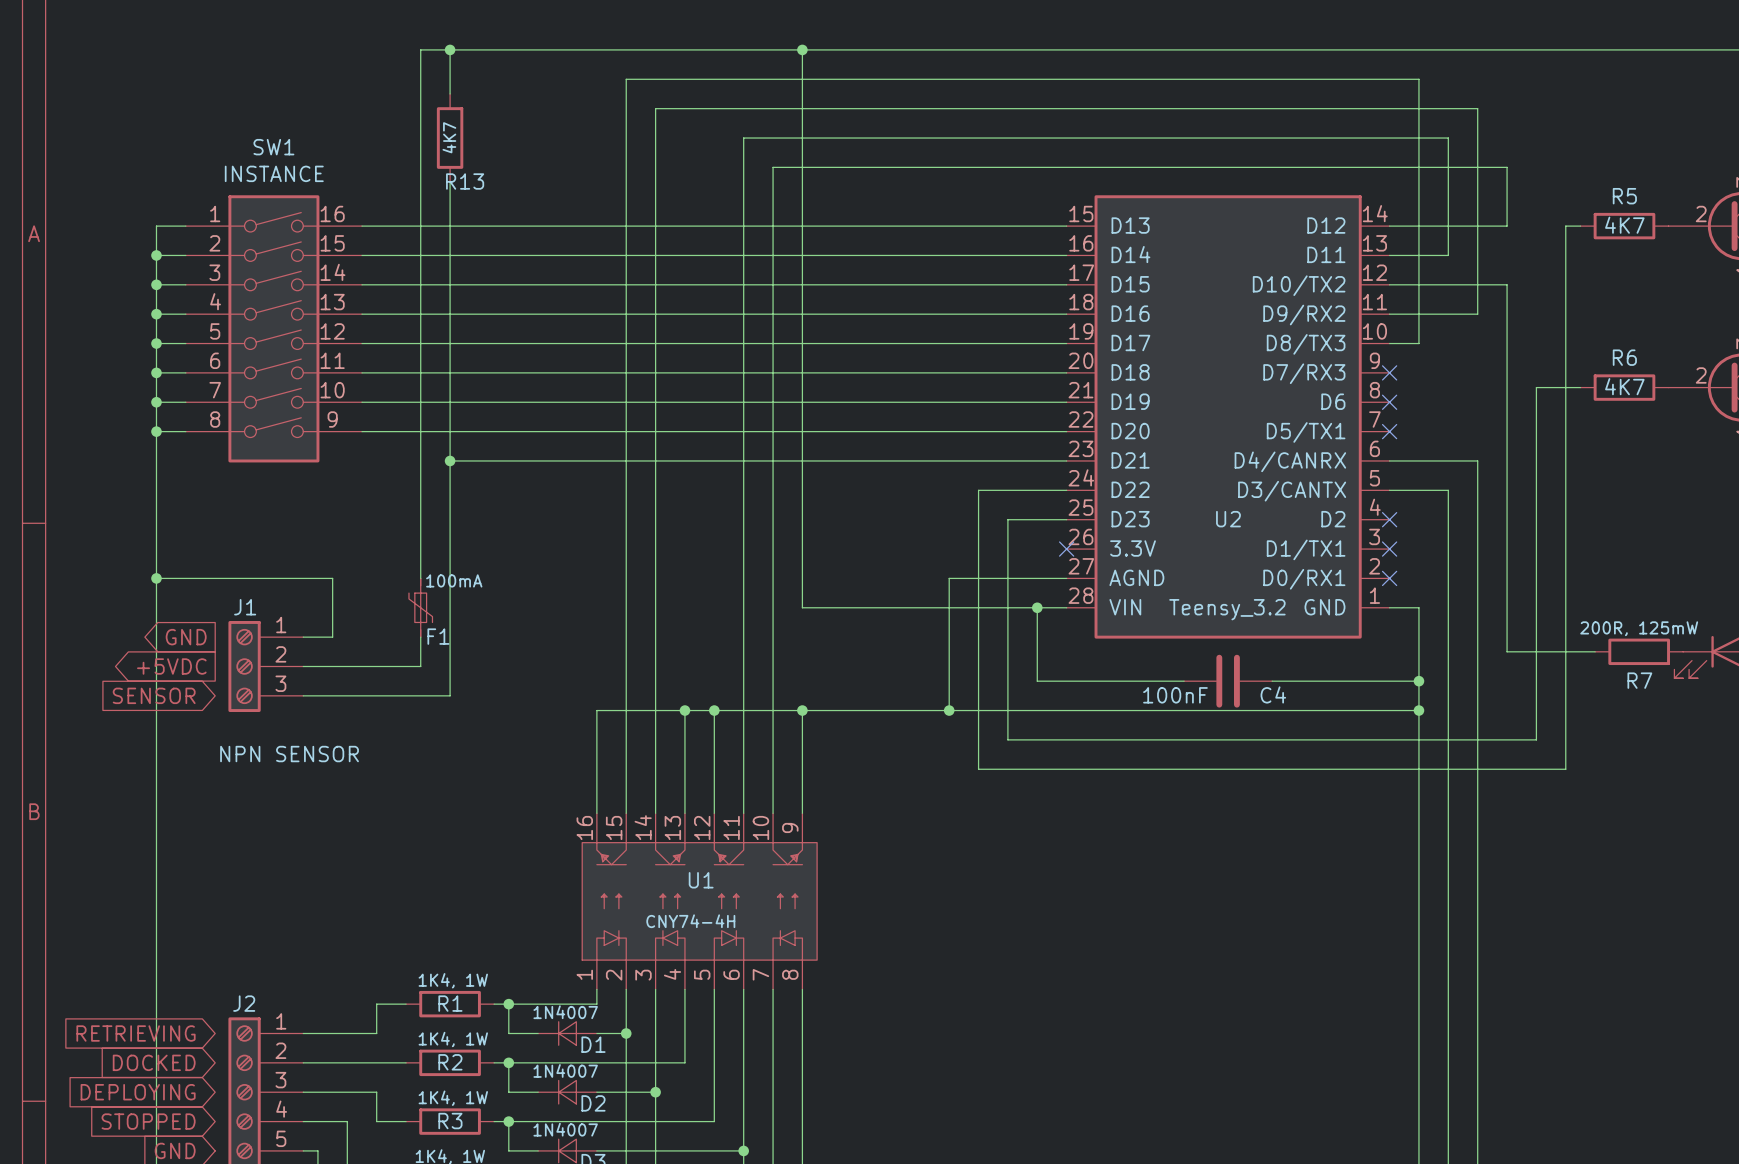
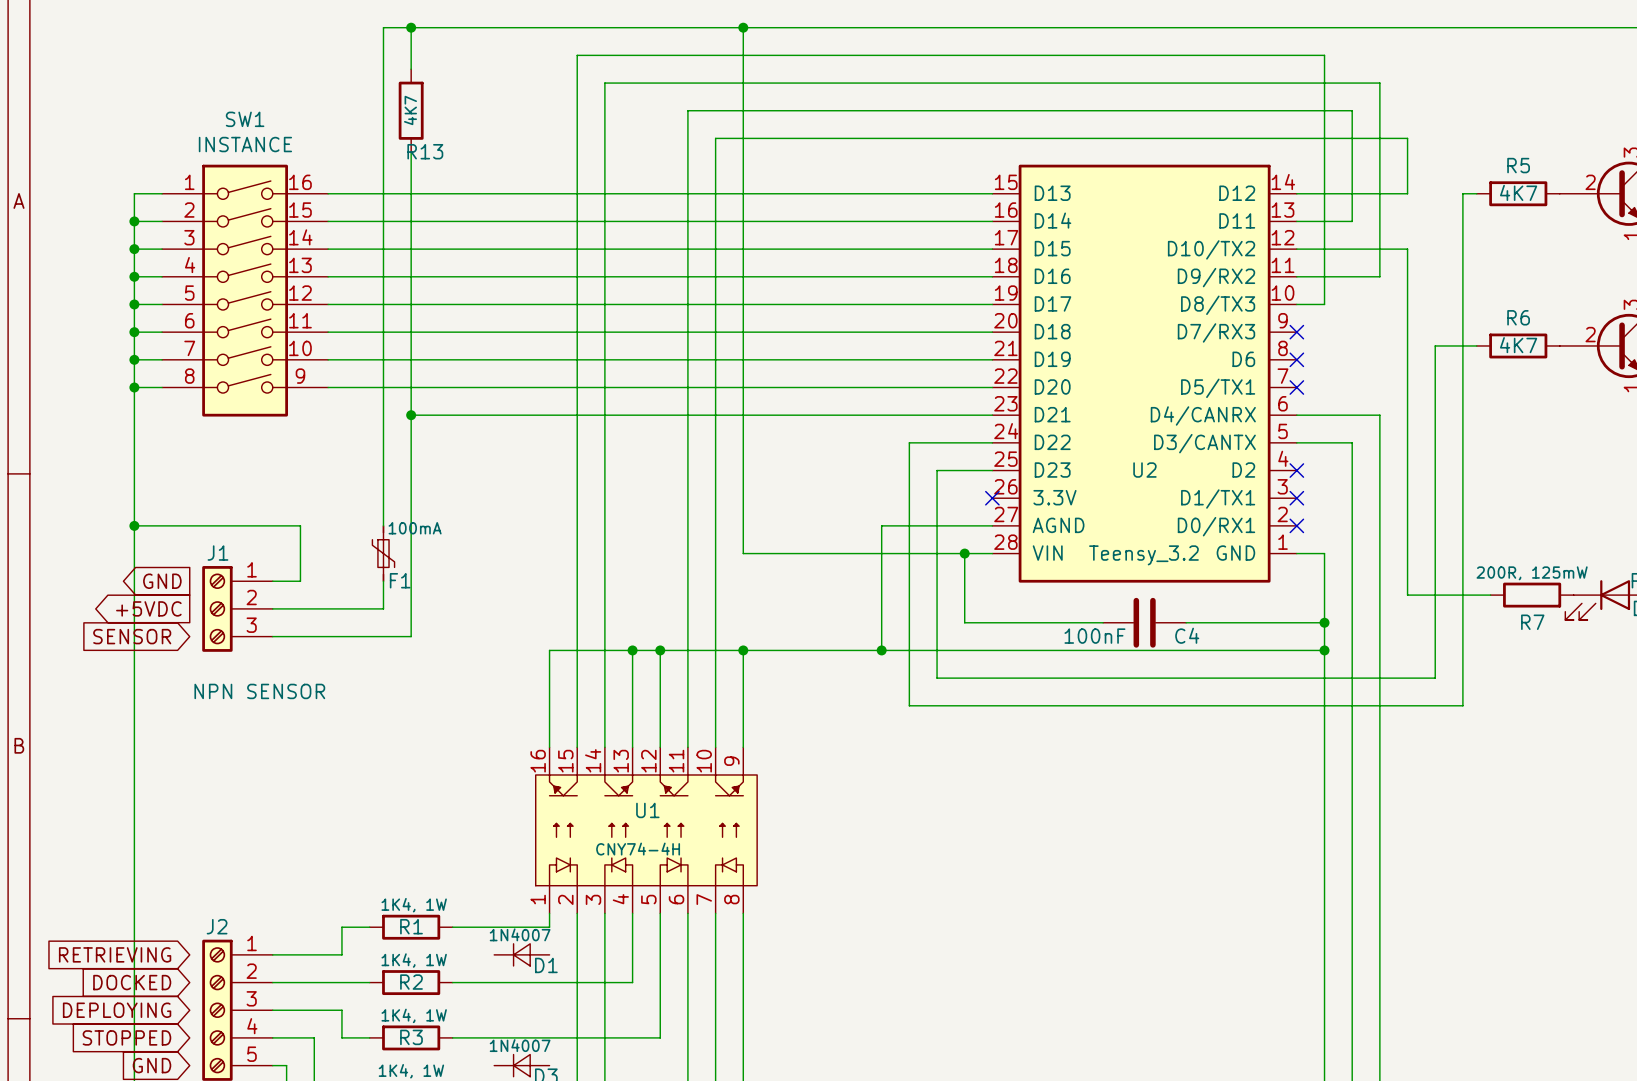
wire: (508, 1004) (508, 1033) (538, 1033) -> none
junction: (508, 1004) -> none
wire: (596, 1033) (626, 1033) -> none
junction: (626, 1033) -> none
wire: (508, 1062) (508, 1092) (538, 1092) -> none
junction: (508, 1062) -> none
D2: 1N4007 (567, 1092) -> none
wire: (596, 1092) (655, 1092) -> none
junction: (655, 1092) -> none
wire: (508, 1121) (508, 1150) (538, 1150) -> none
junction: (508, 1121) -> none
wire: (596, 1150) (743, 1150) -> none
junction: (743, 1150) -> none

